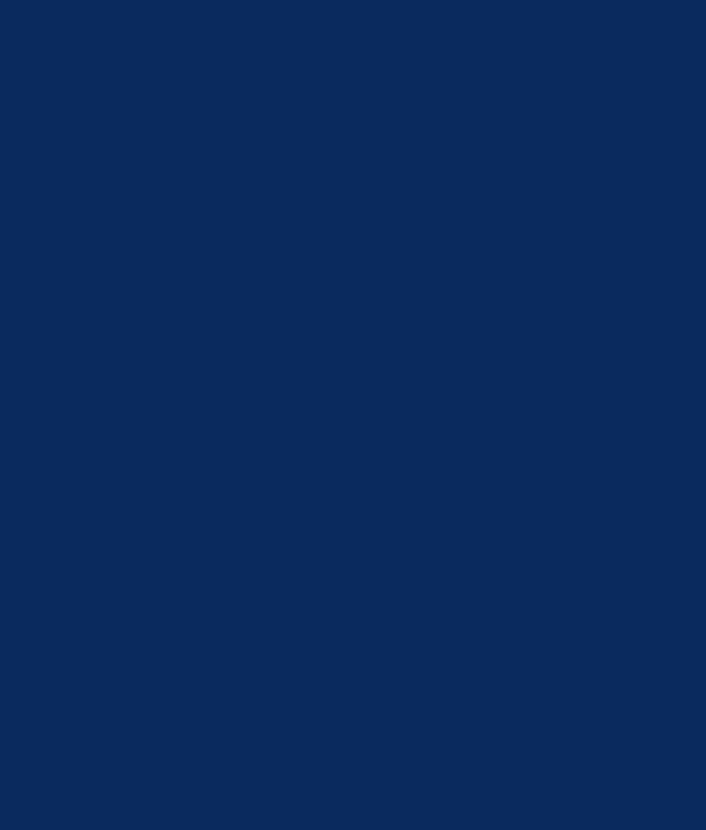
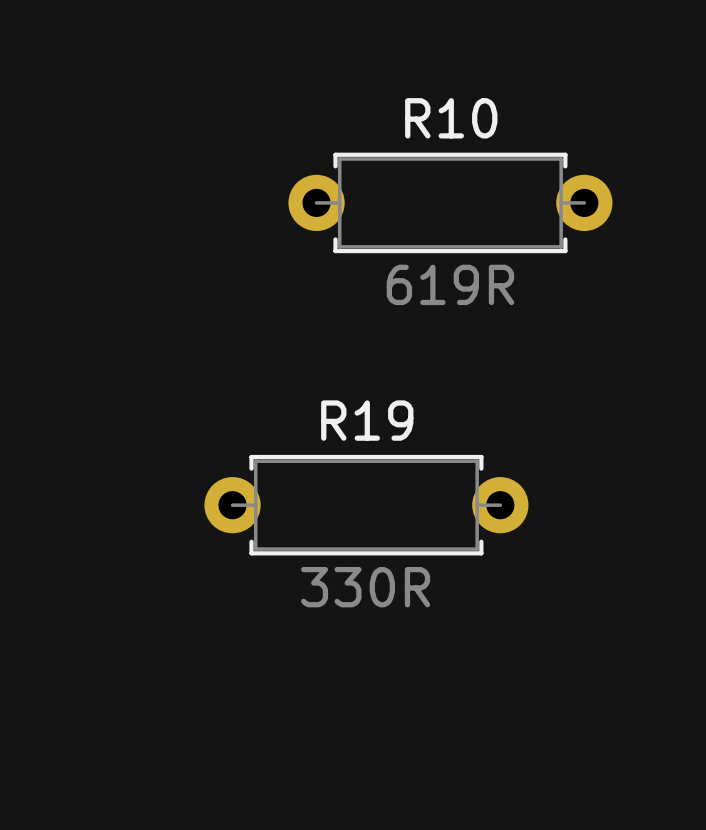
R10: none -> 619R (450, 202)
R19: none -> 330R (366, 505)

